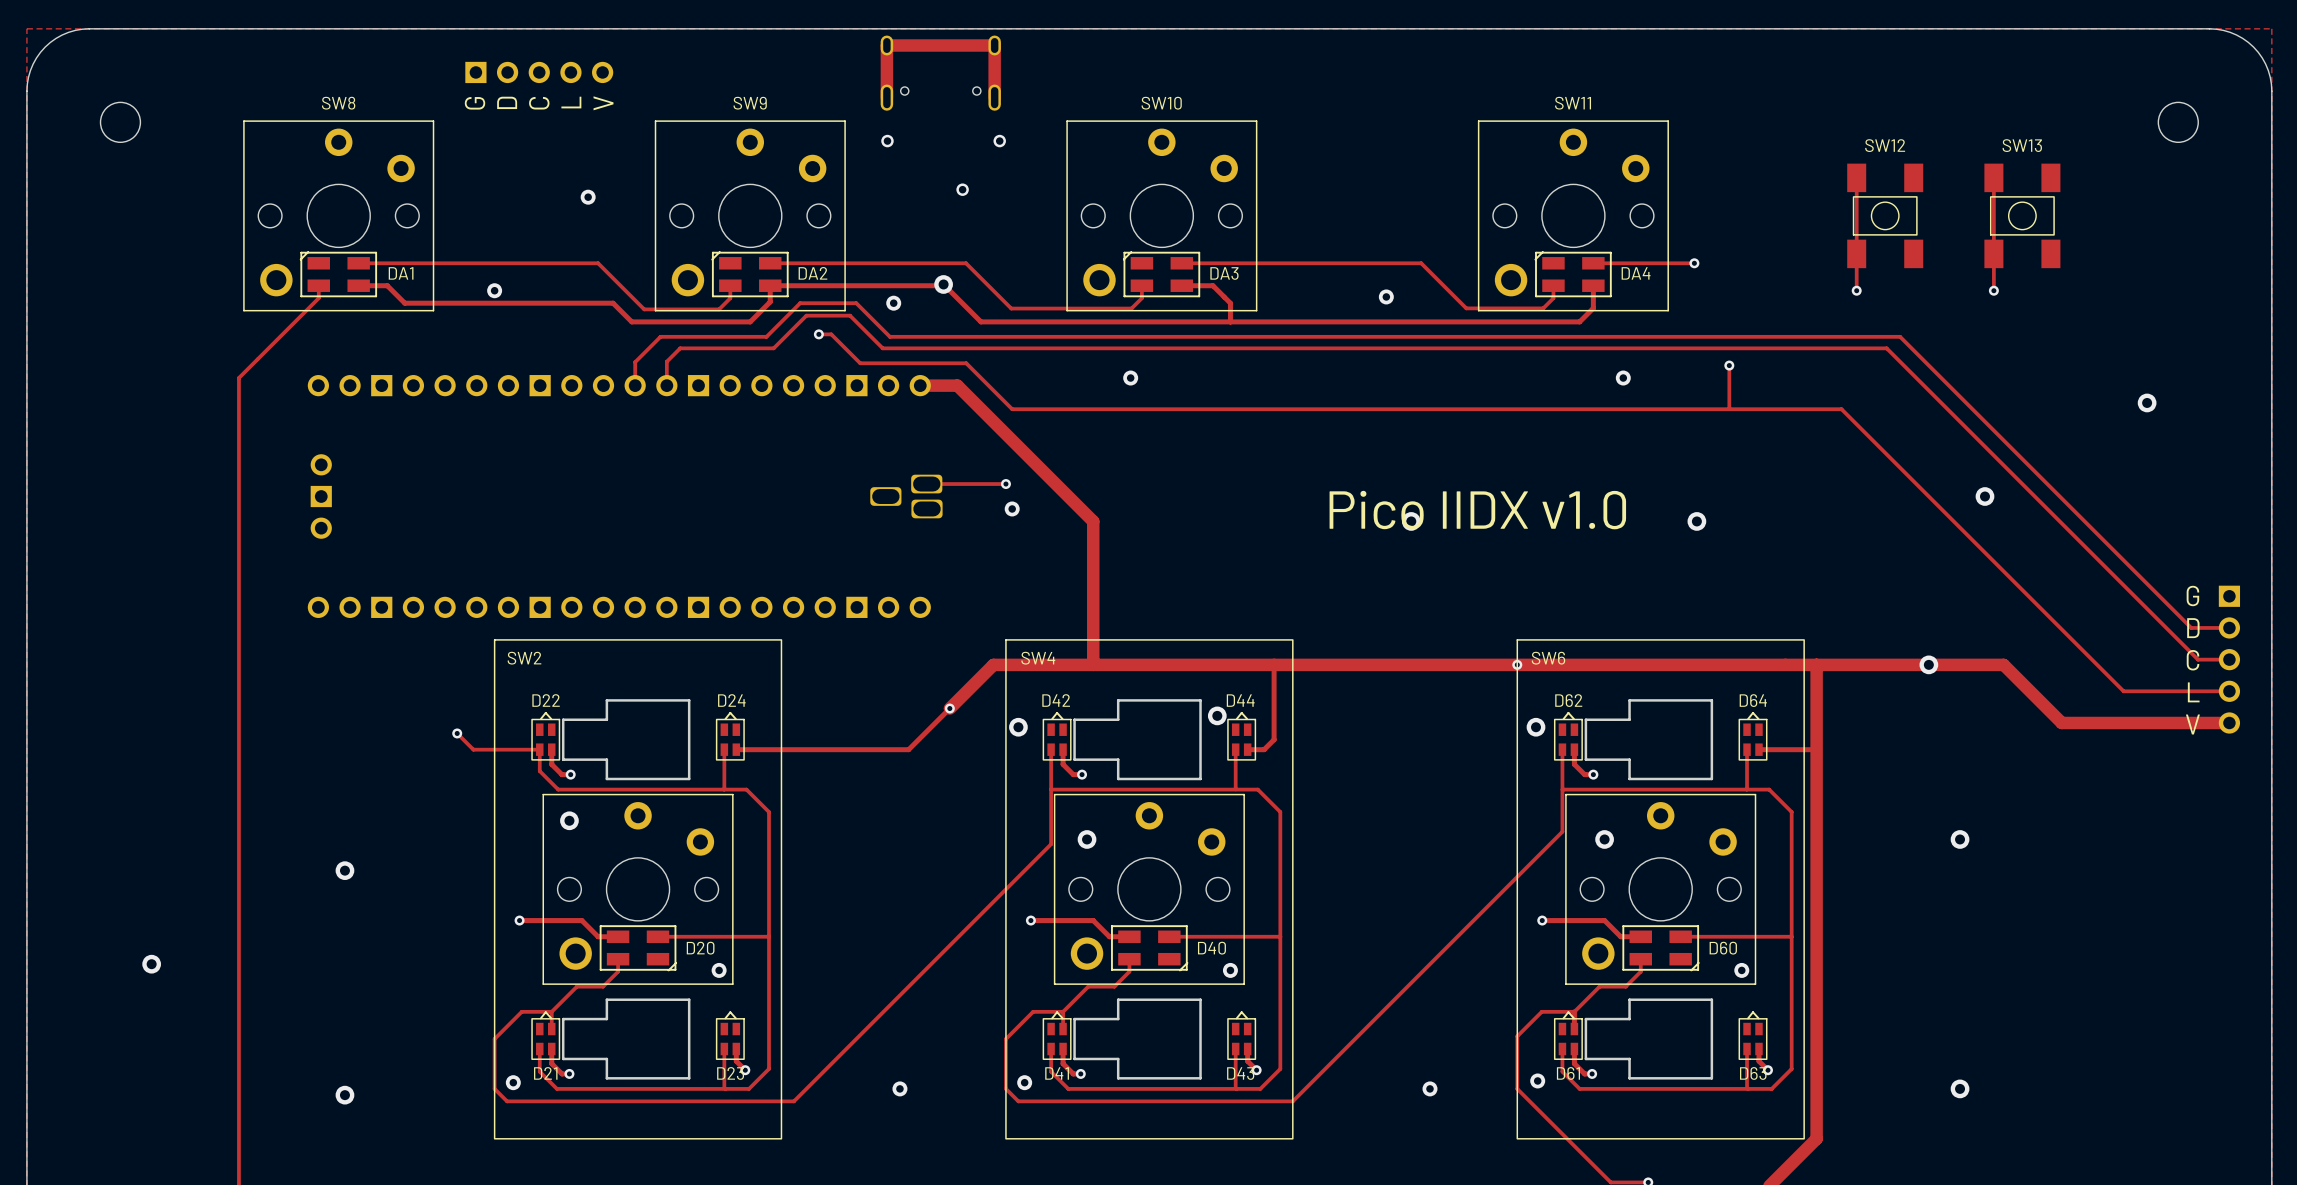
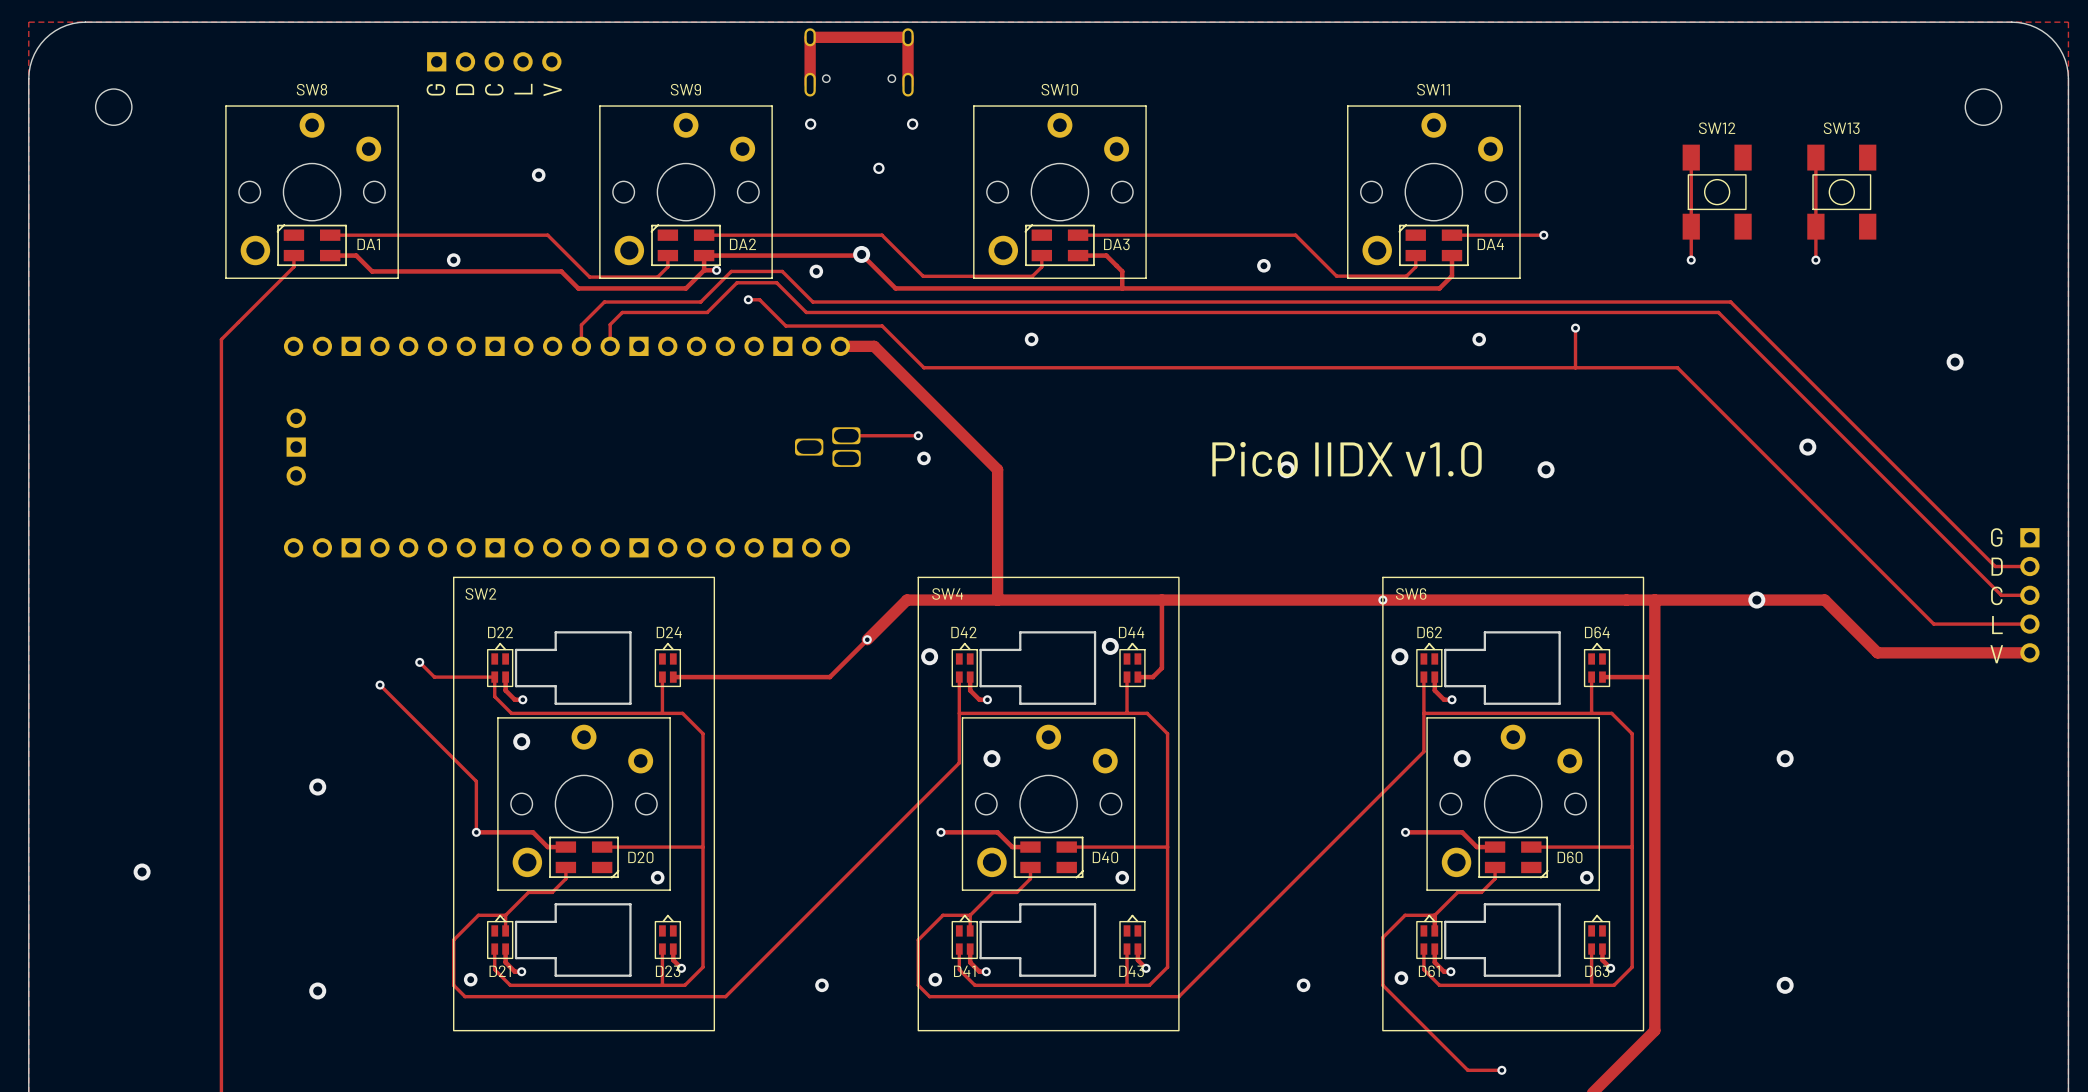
track: none -> (704, 270) (716, 270)
via: none -> (716, 270)
track: none -> (380, 685) (476, 781) (476, 832)
via: none -> (380, 685)

